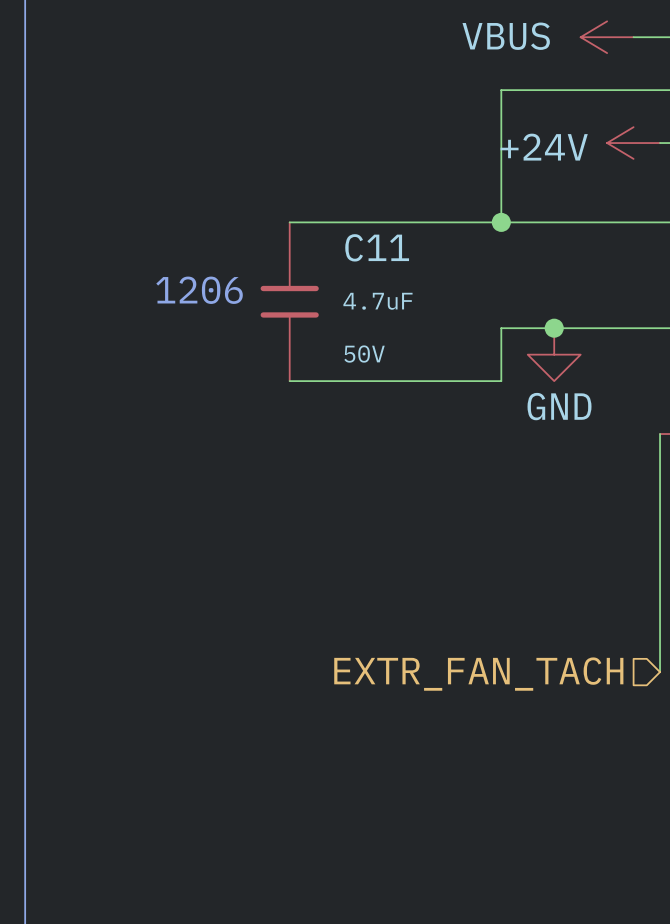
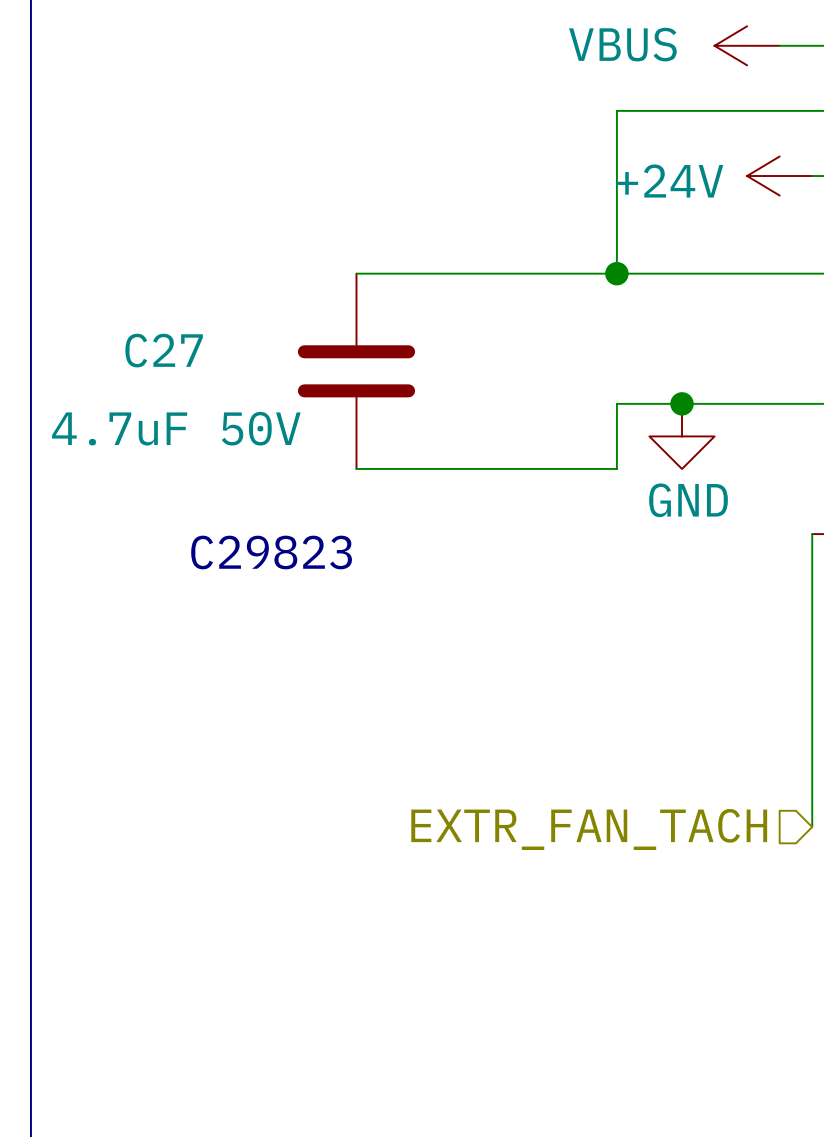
text: 1206 (199, 290) -> none
C11: 4.7uF (289, 301) -> none
C27: none -> 4.7uF 50V (356, 371)
text: none -> C29823 (271, 552)

